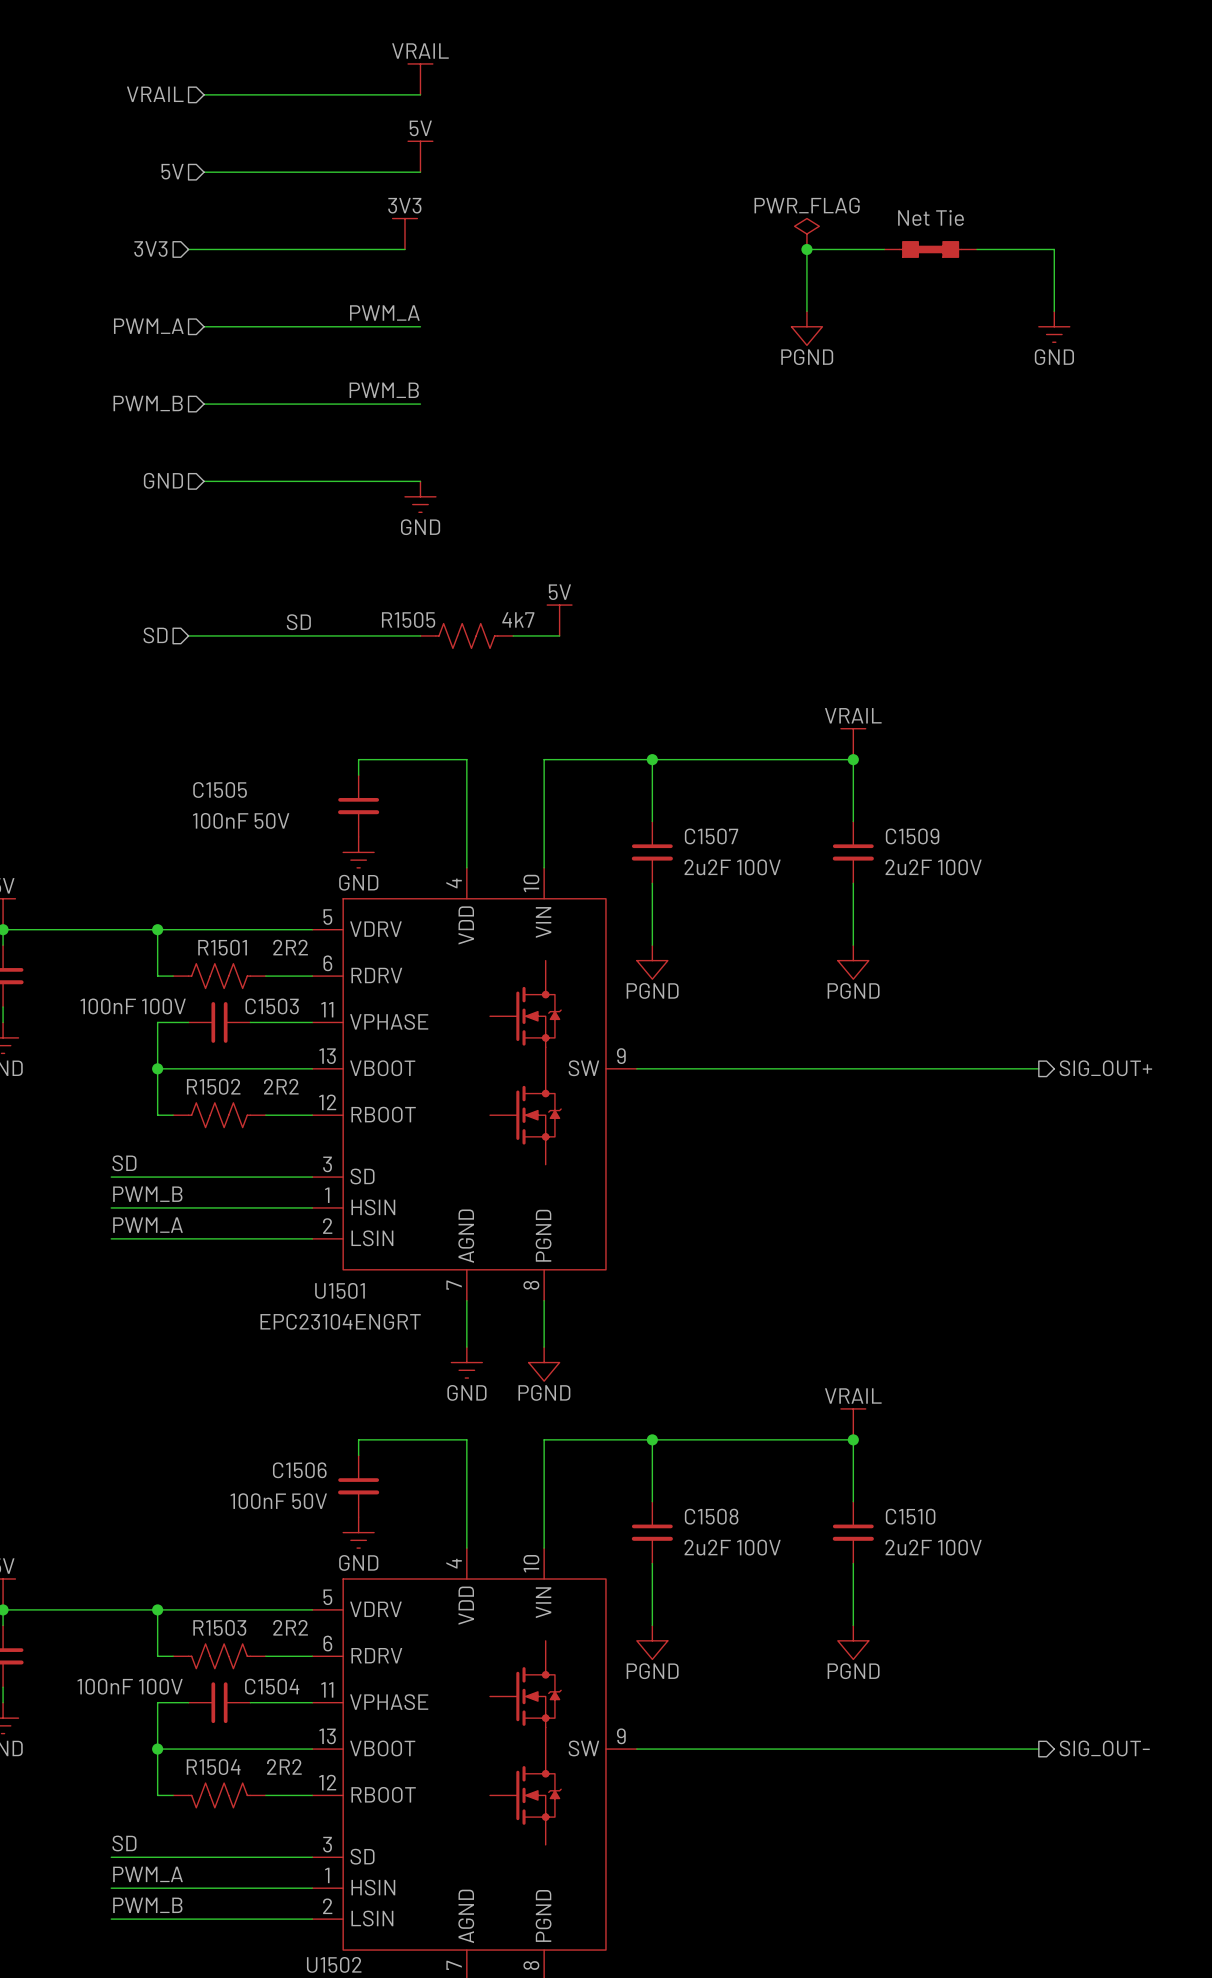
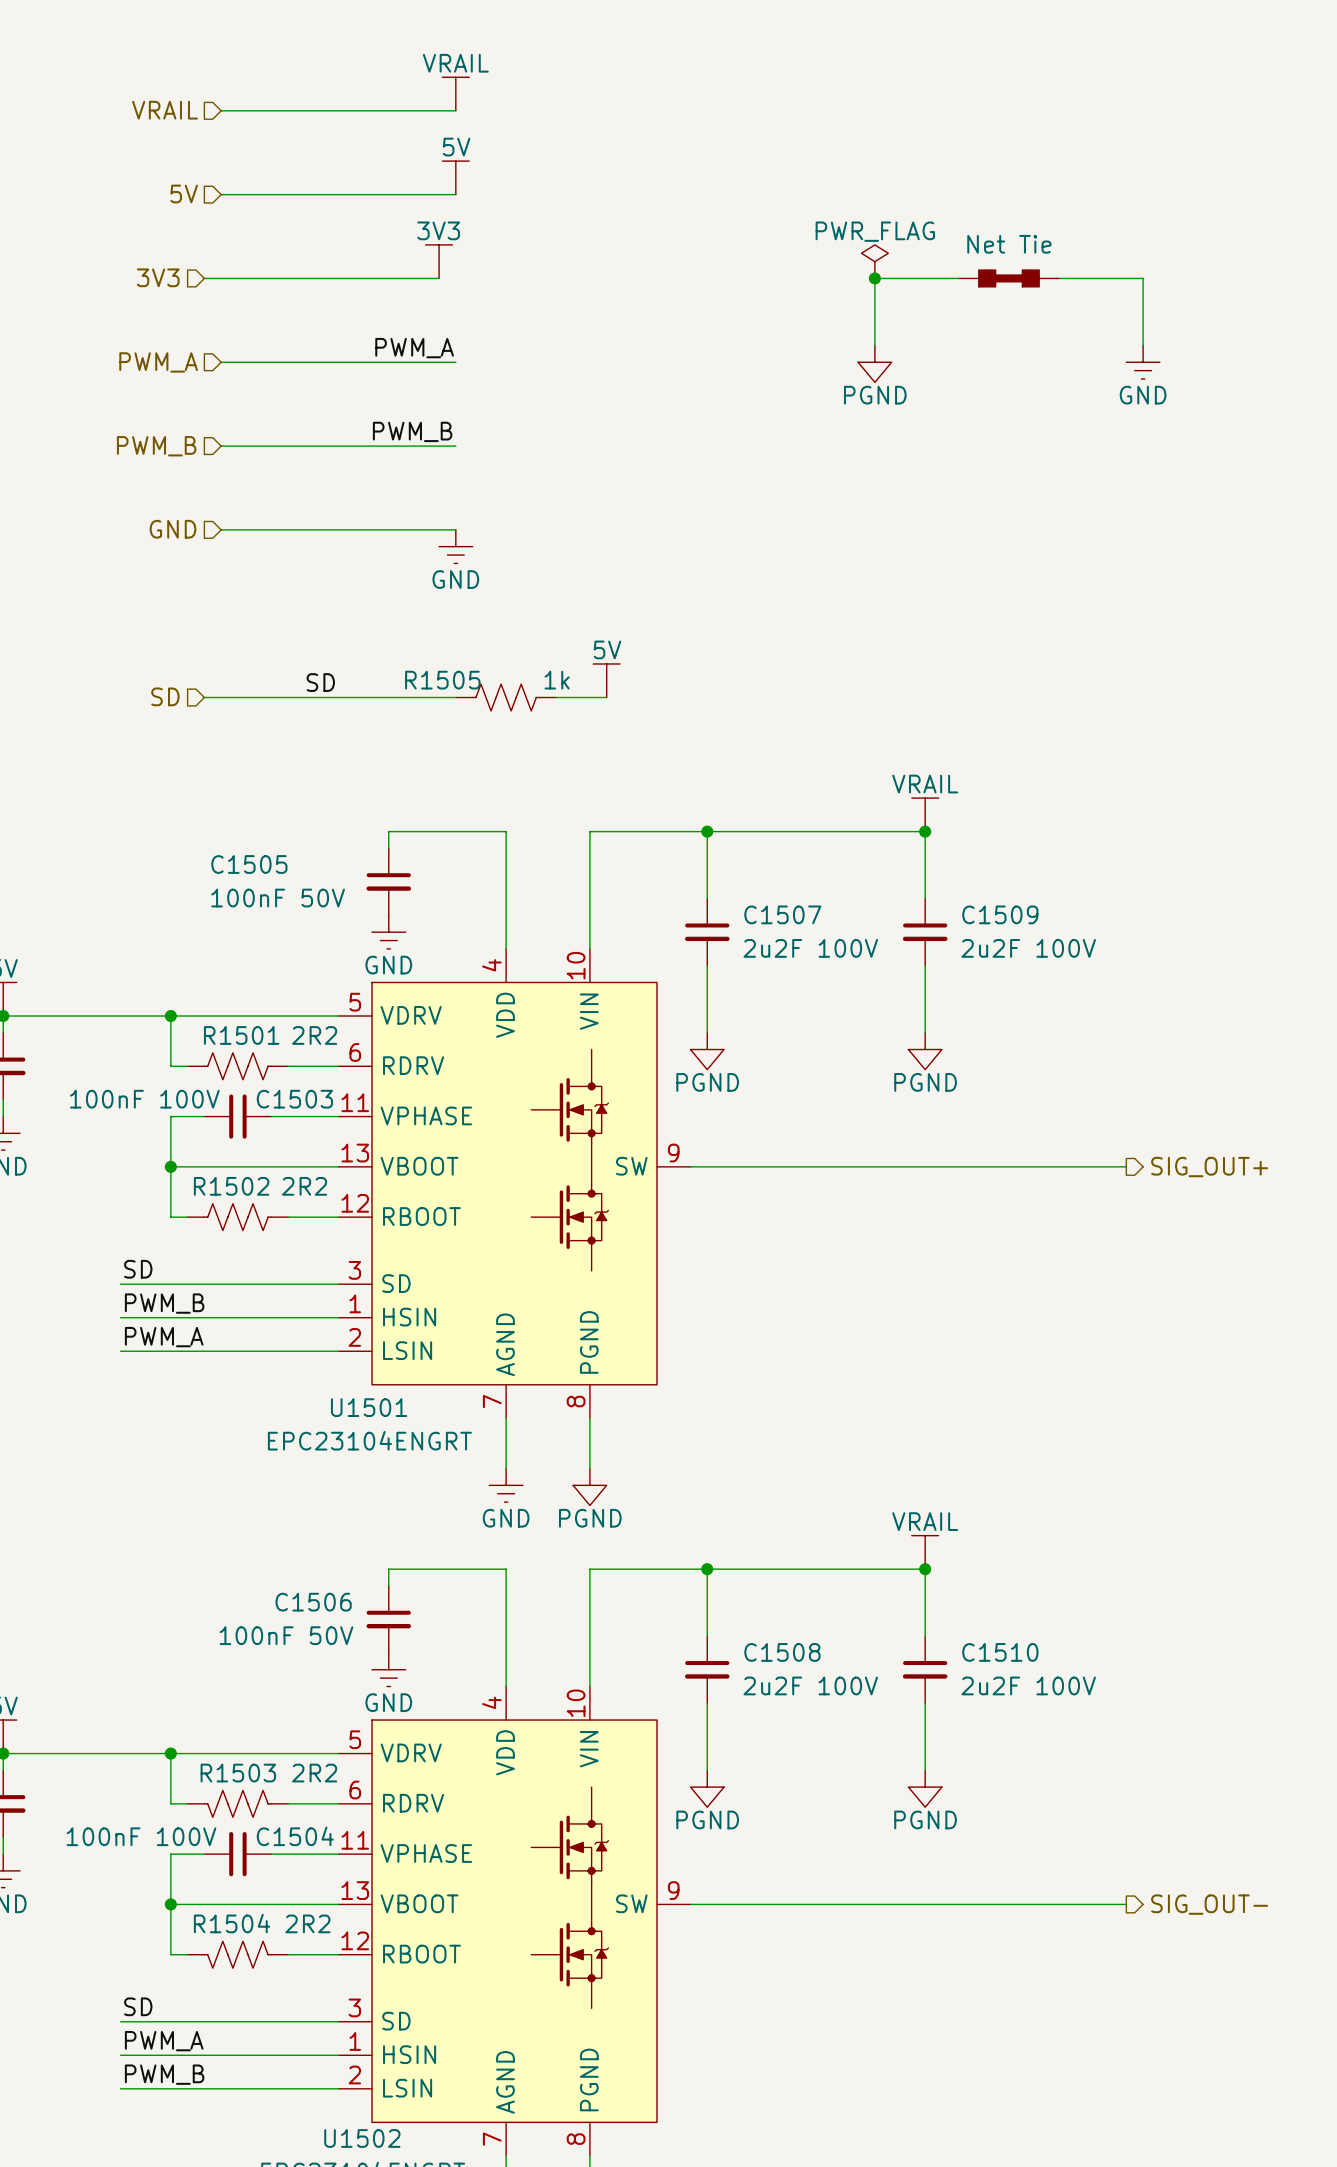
R1505 value: 4k7 (518, 619) -> 1k (557, 680)

